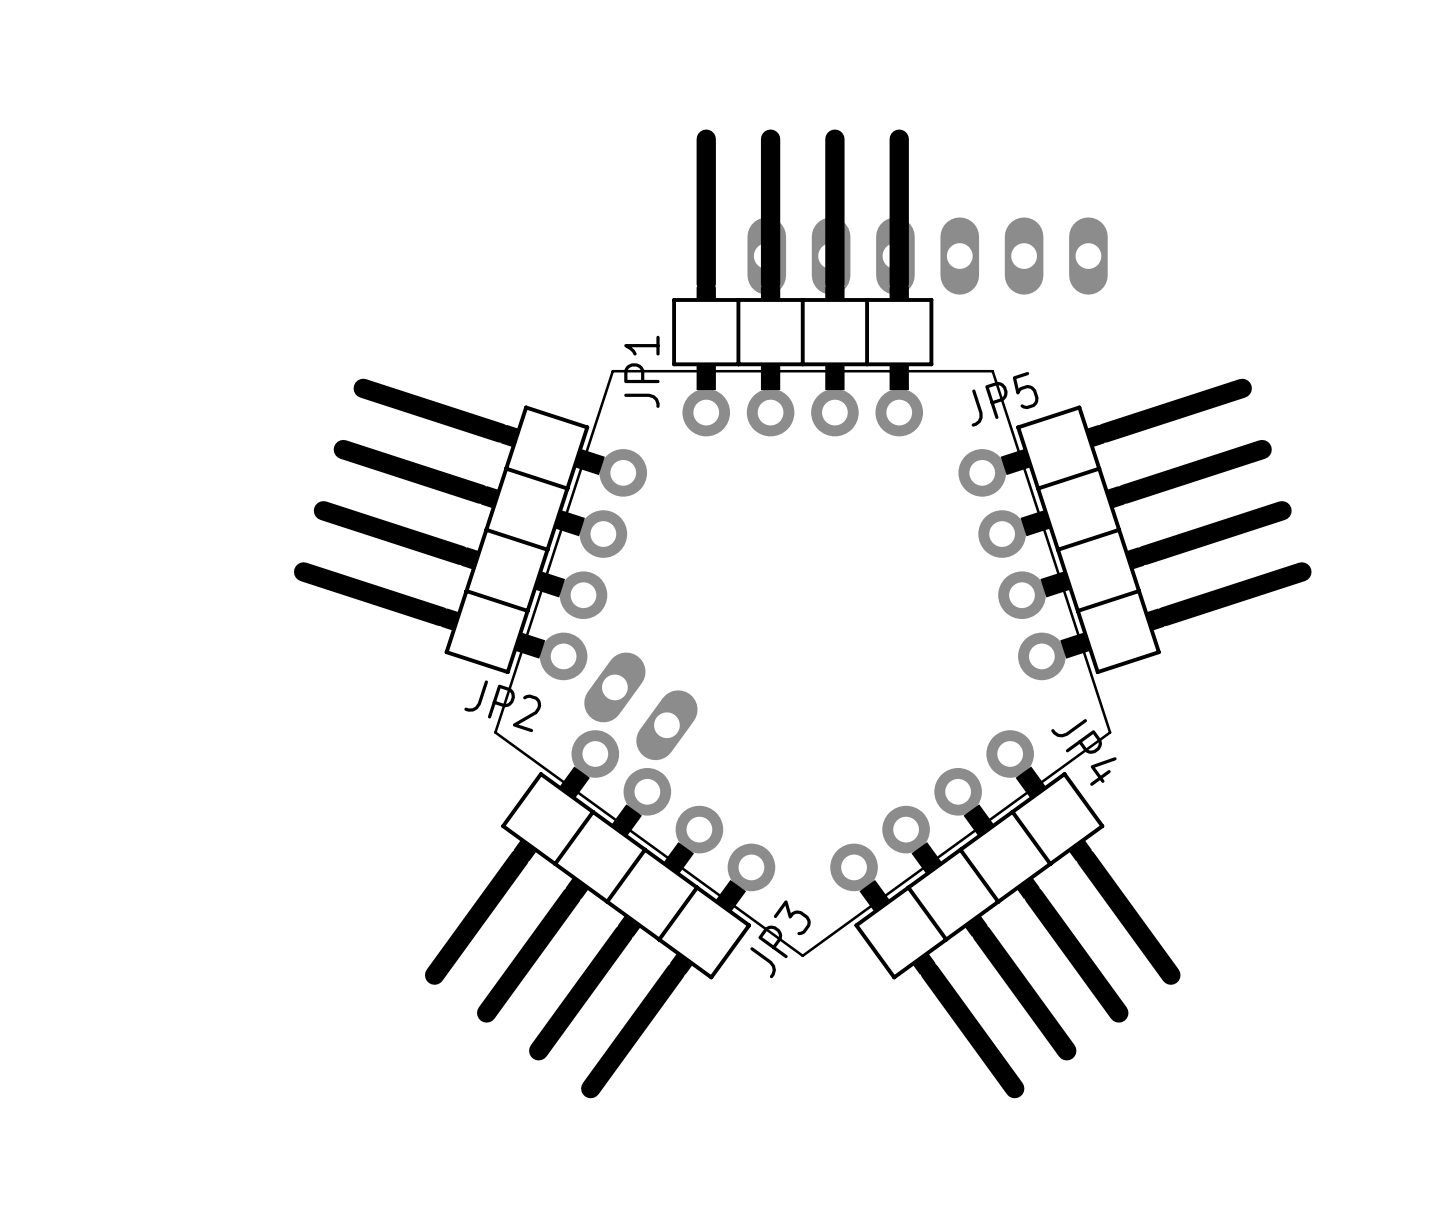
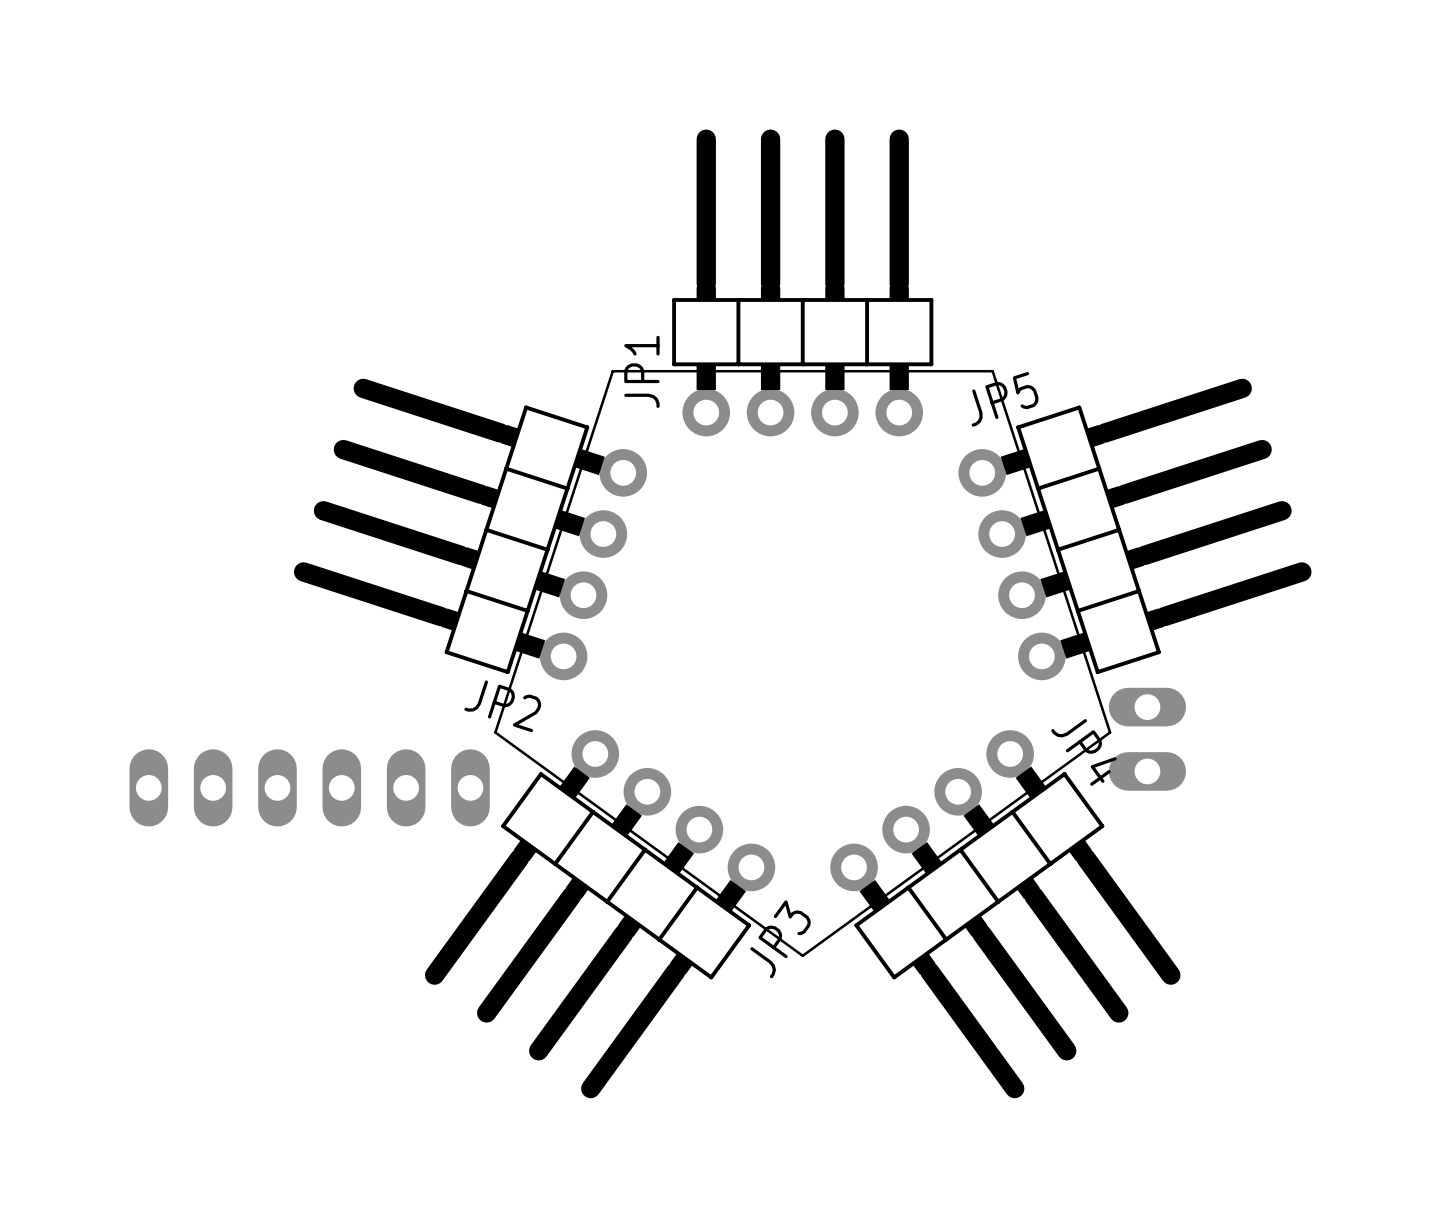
part: (927, 256) -> none
part: (640, 706) -> none
part: none -> (1147, 739)
part: none -> (309, 787)

